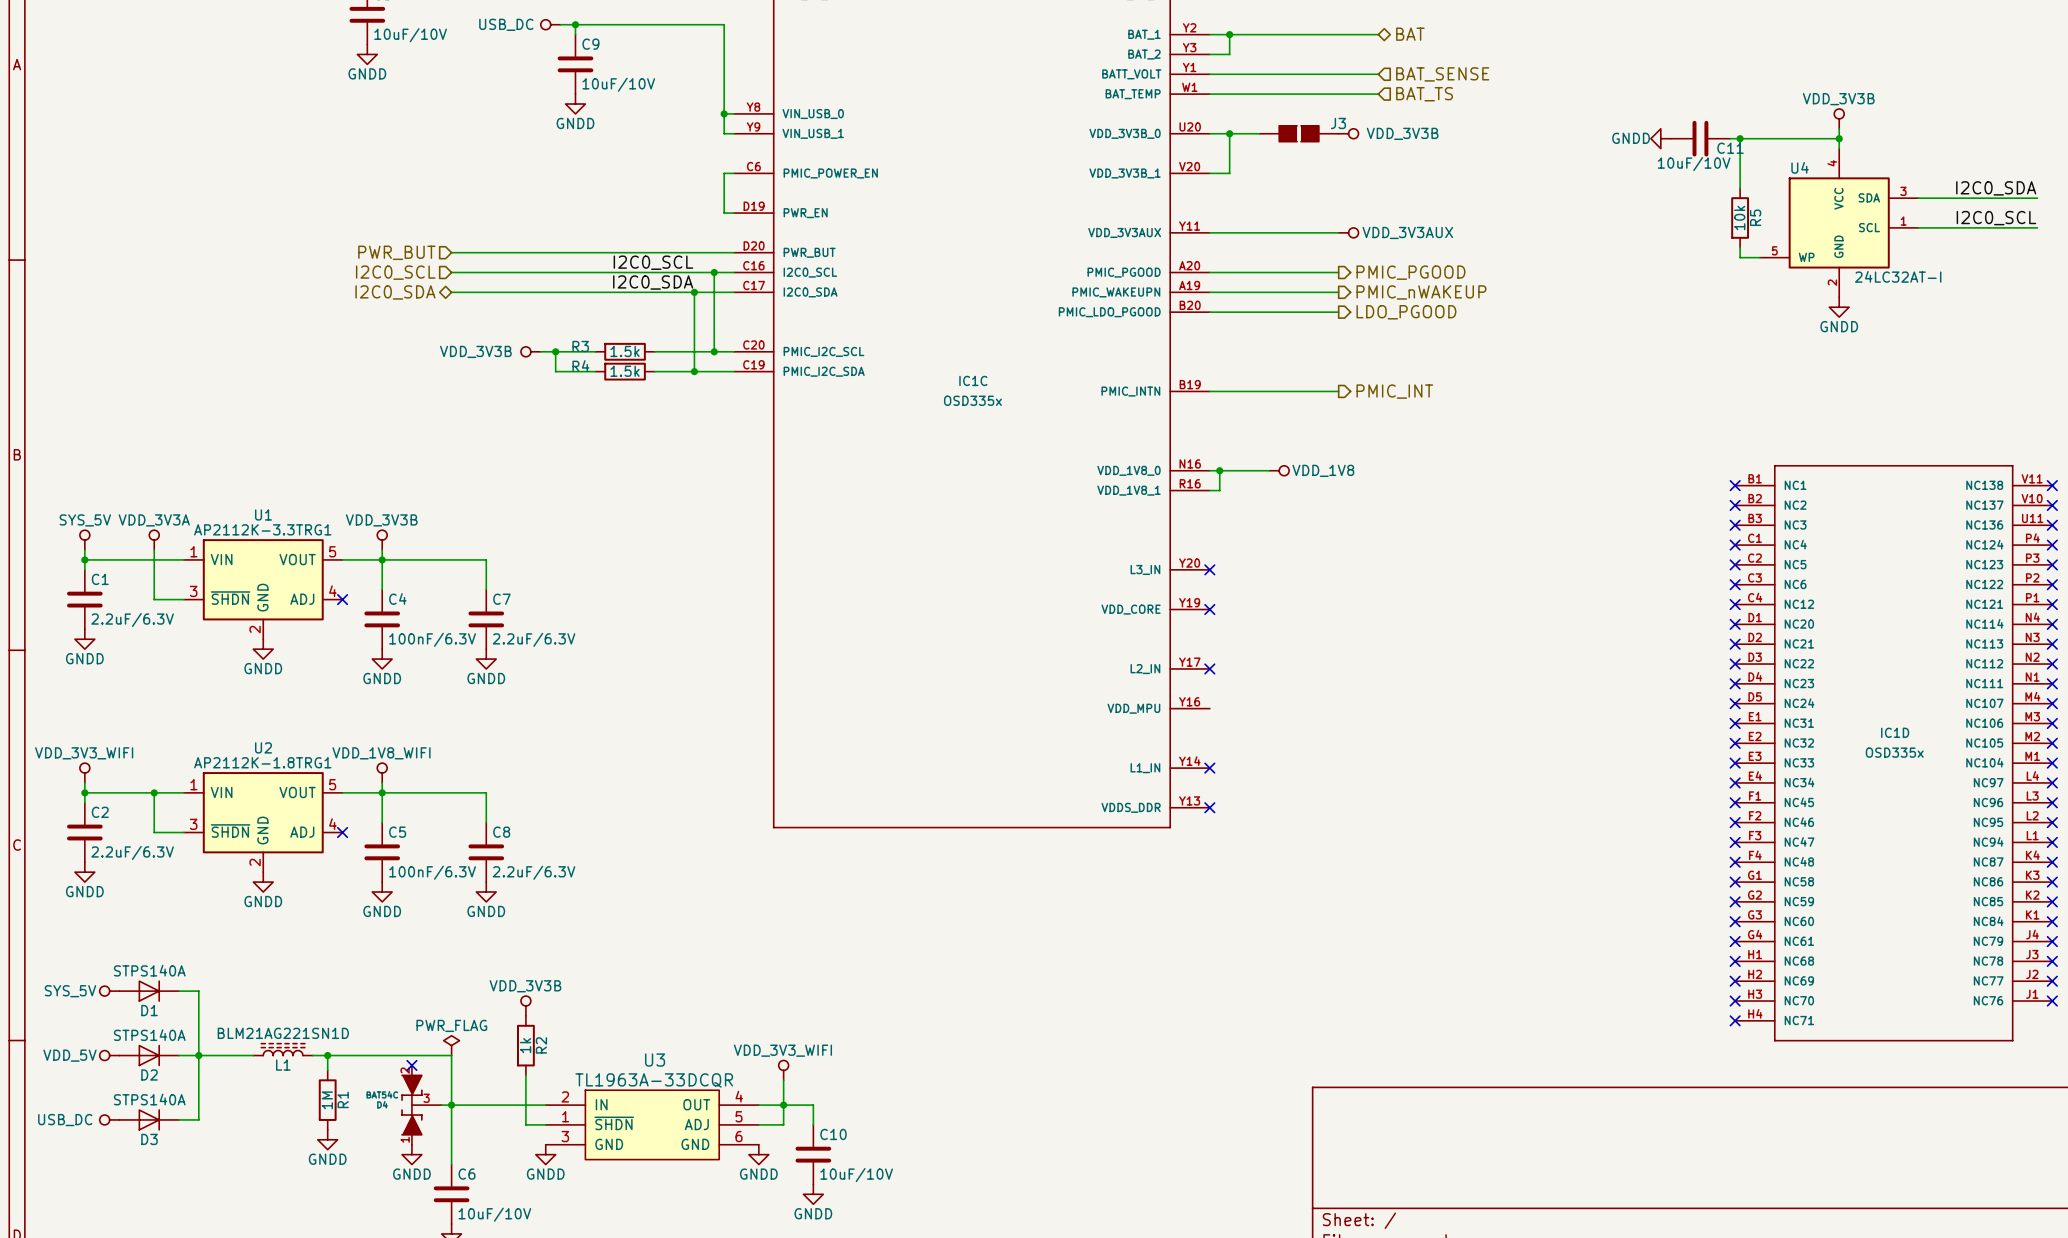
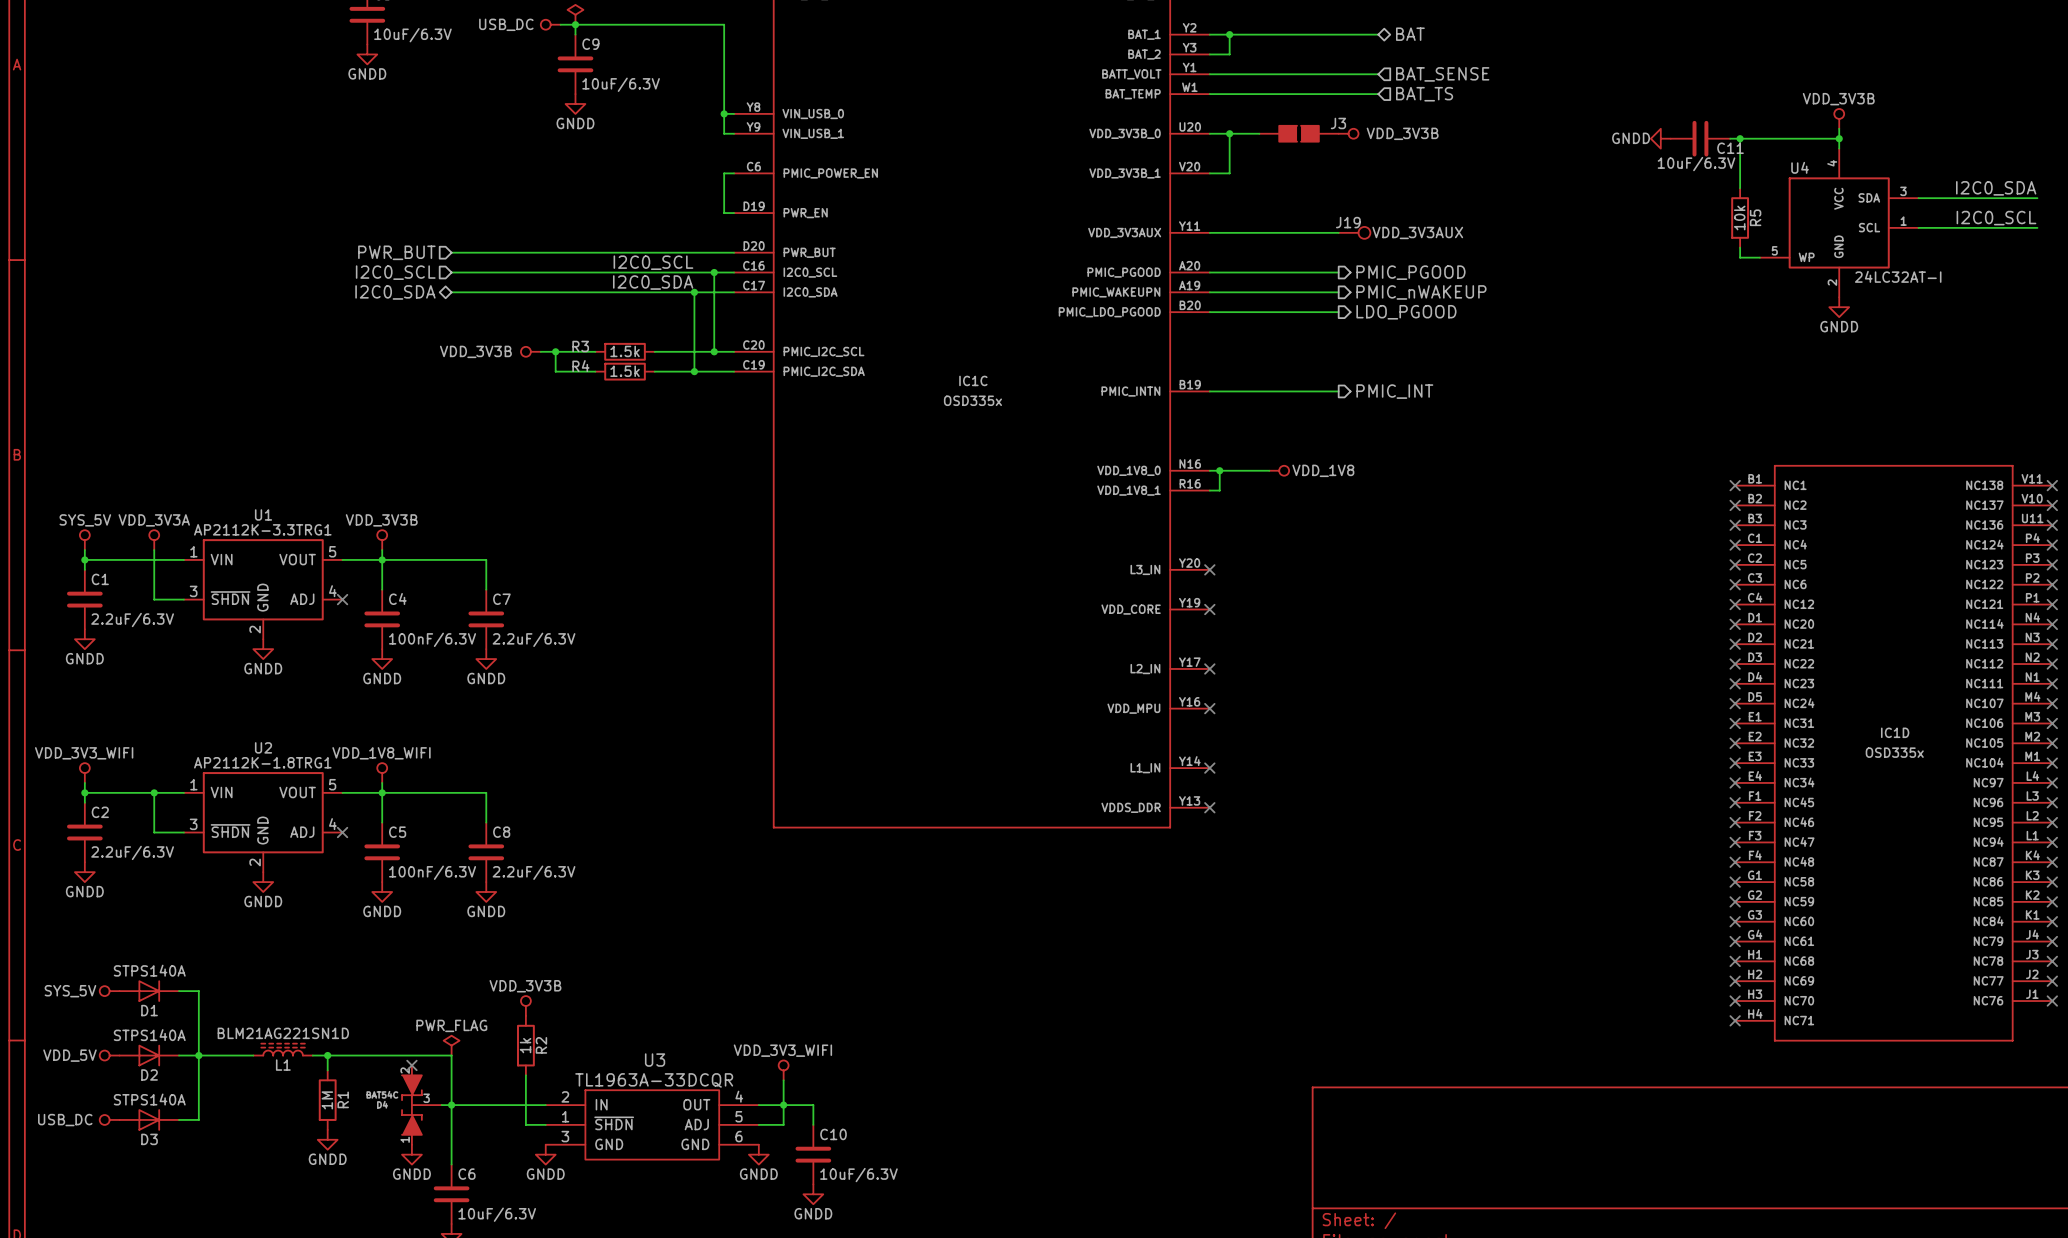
power symbol: none -> (575, 14)
part value: 10uF/10V (410, 35) -> 10uF/6.3V (412, 35)
C9 value: 10uF/10V (618, 84) -> 10uF/6.3V (621, 84)
C11 value: 10uF/10V (1694, 164) -> 10uF/6.3V (1696, 164)
power symbol: VDD_3V3AUX (1348, 232) -> none
J19: none -> VDD_3V3AUX (1354, 232)
no-connect mark: none -> (1209, 708)
C10 value: 10uF/10V (856, 1175) -> 10uF/6.3V (858, 1175)
C6 value: 10uF/10V (494, 1214) -> 10uF/6.3V (497, 1214)

